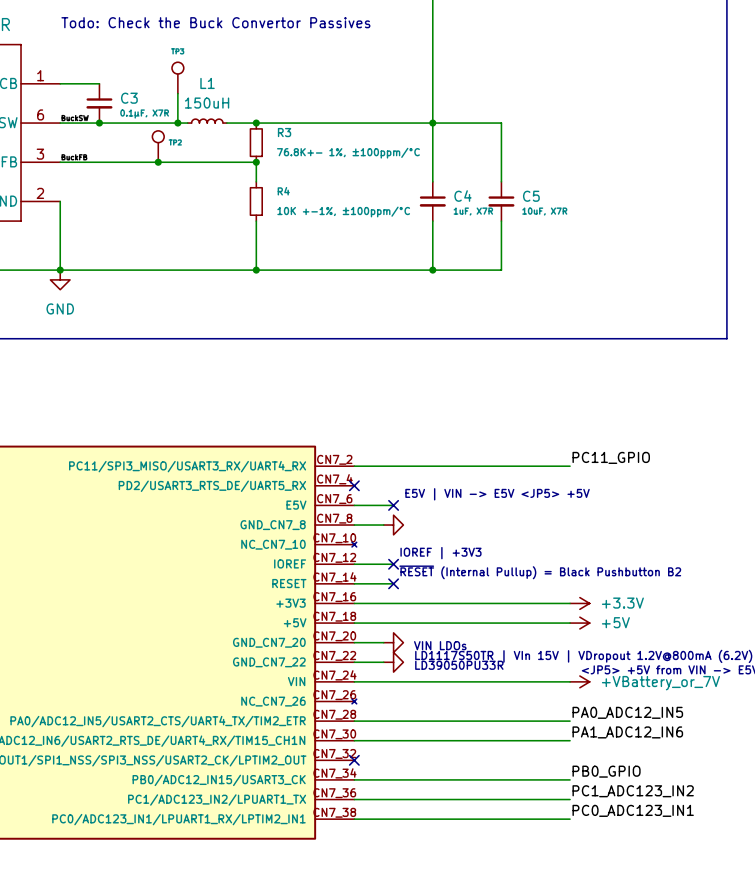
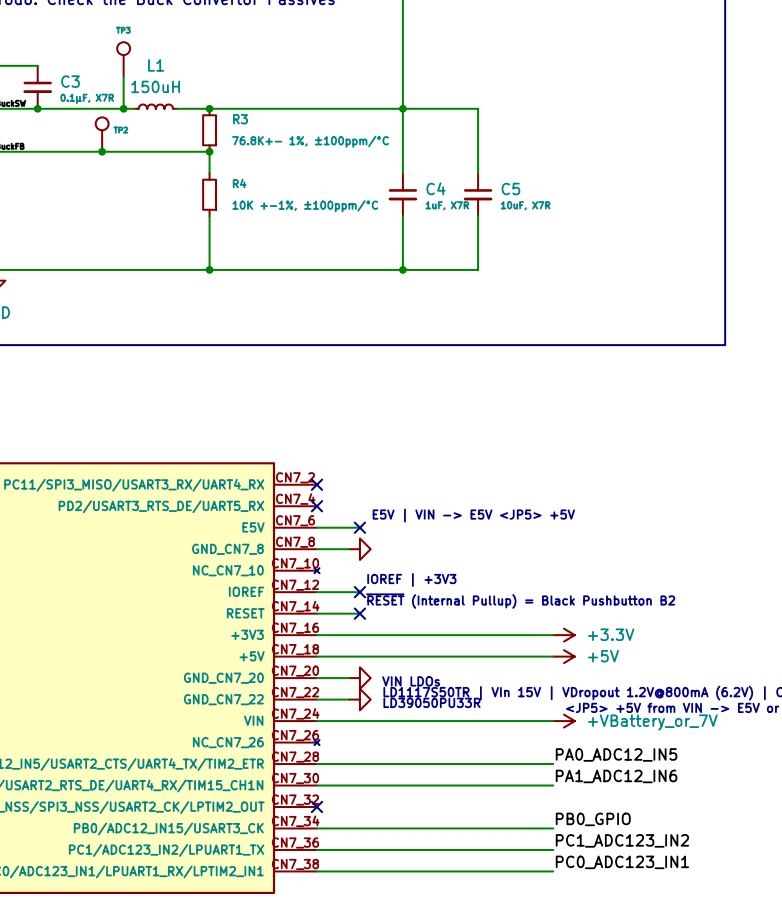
label: PC11_GPIO (611, 457) -> none
wire: (354, 466) (570, 466) -> none
no-connect mark: none -> (316, 484)

